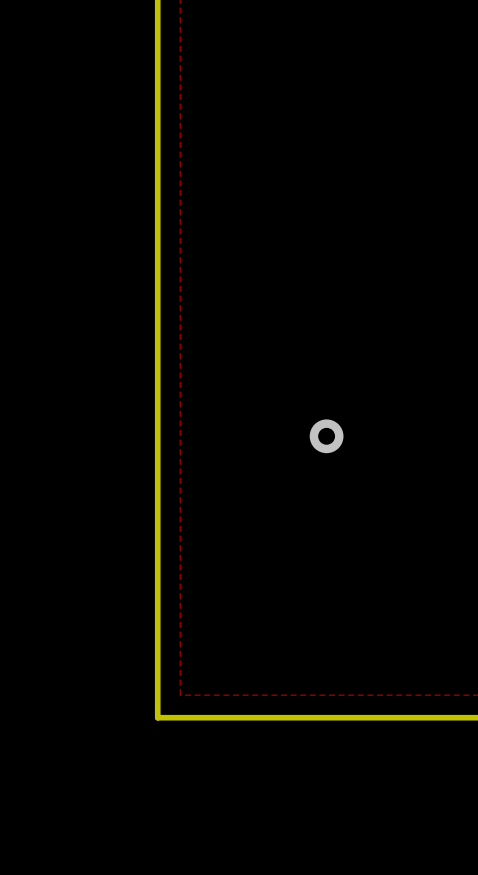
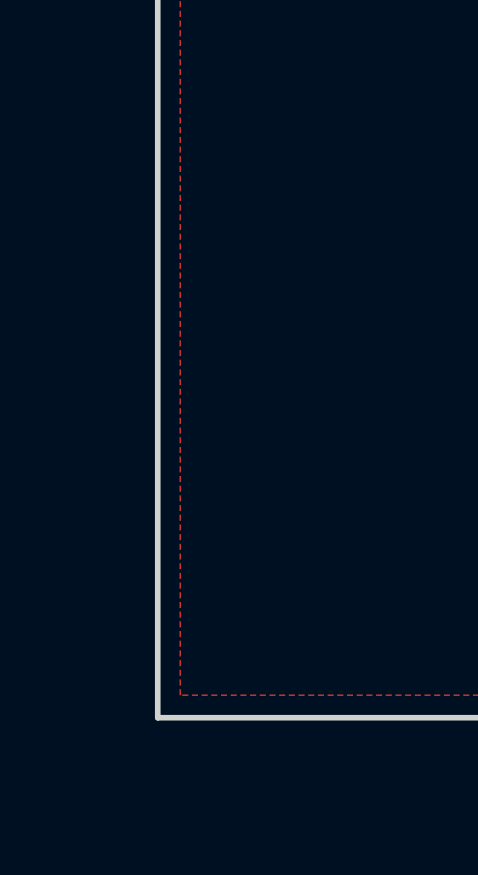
via: (326, 436) -> none

